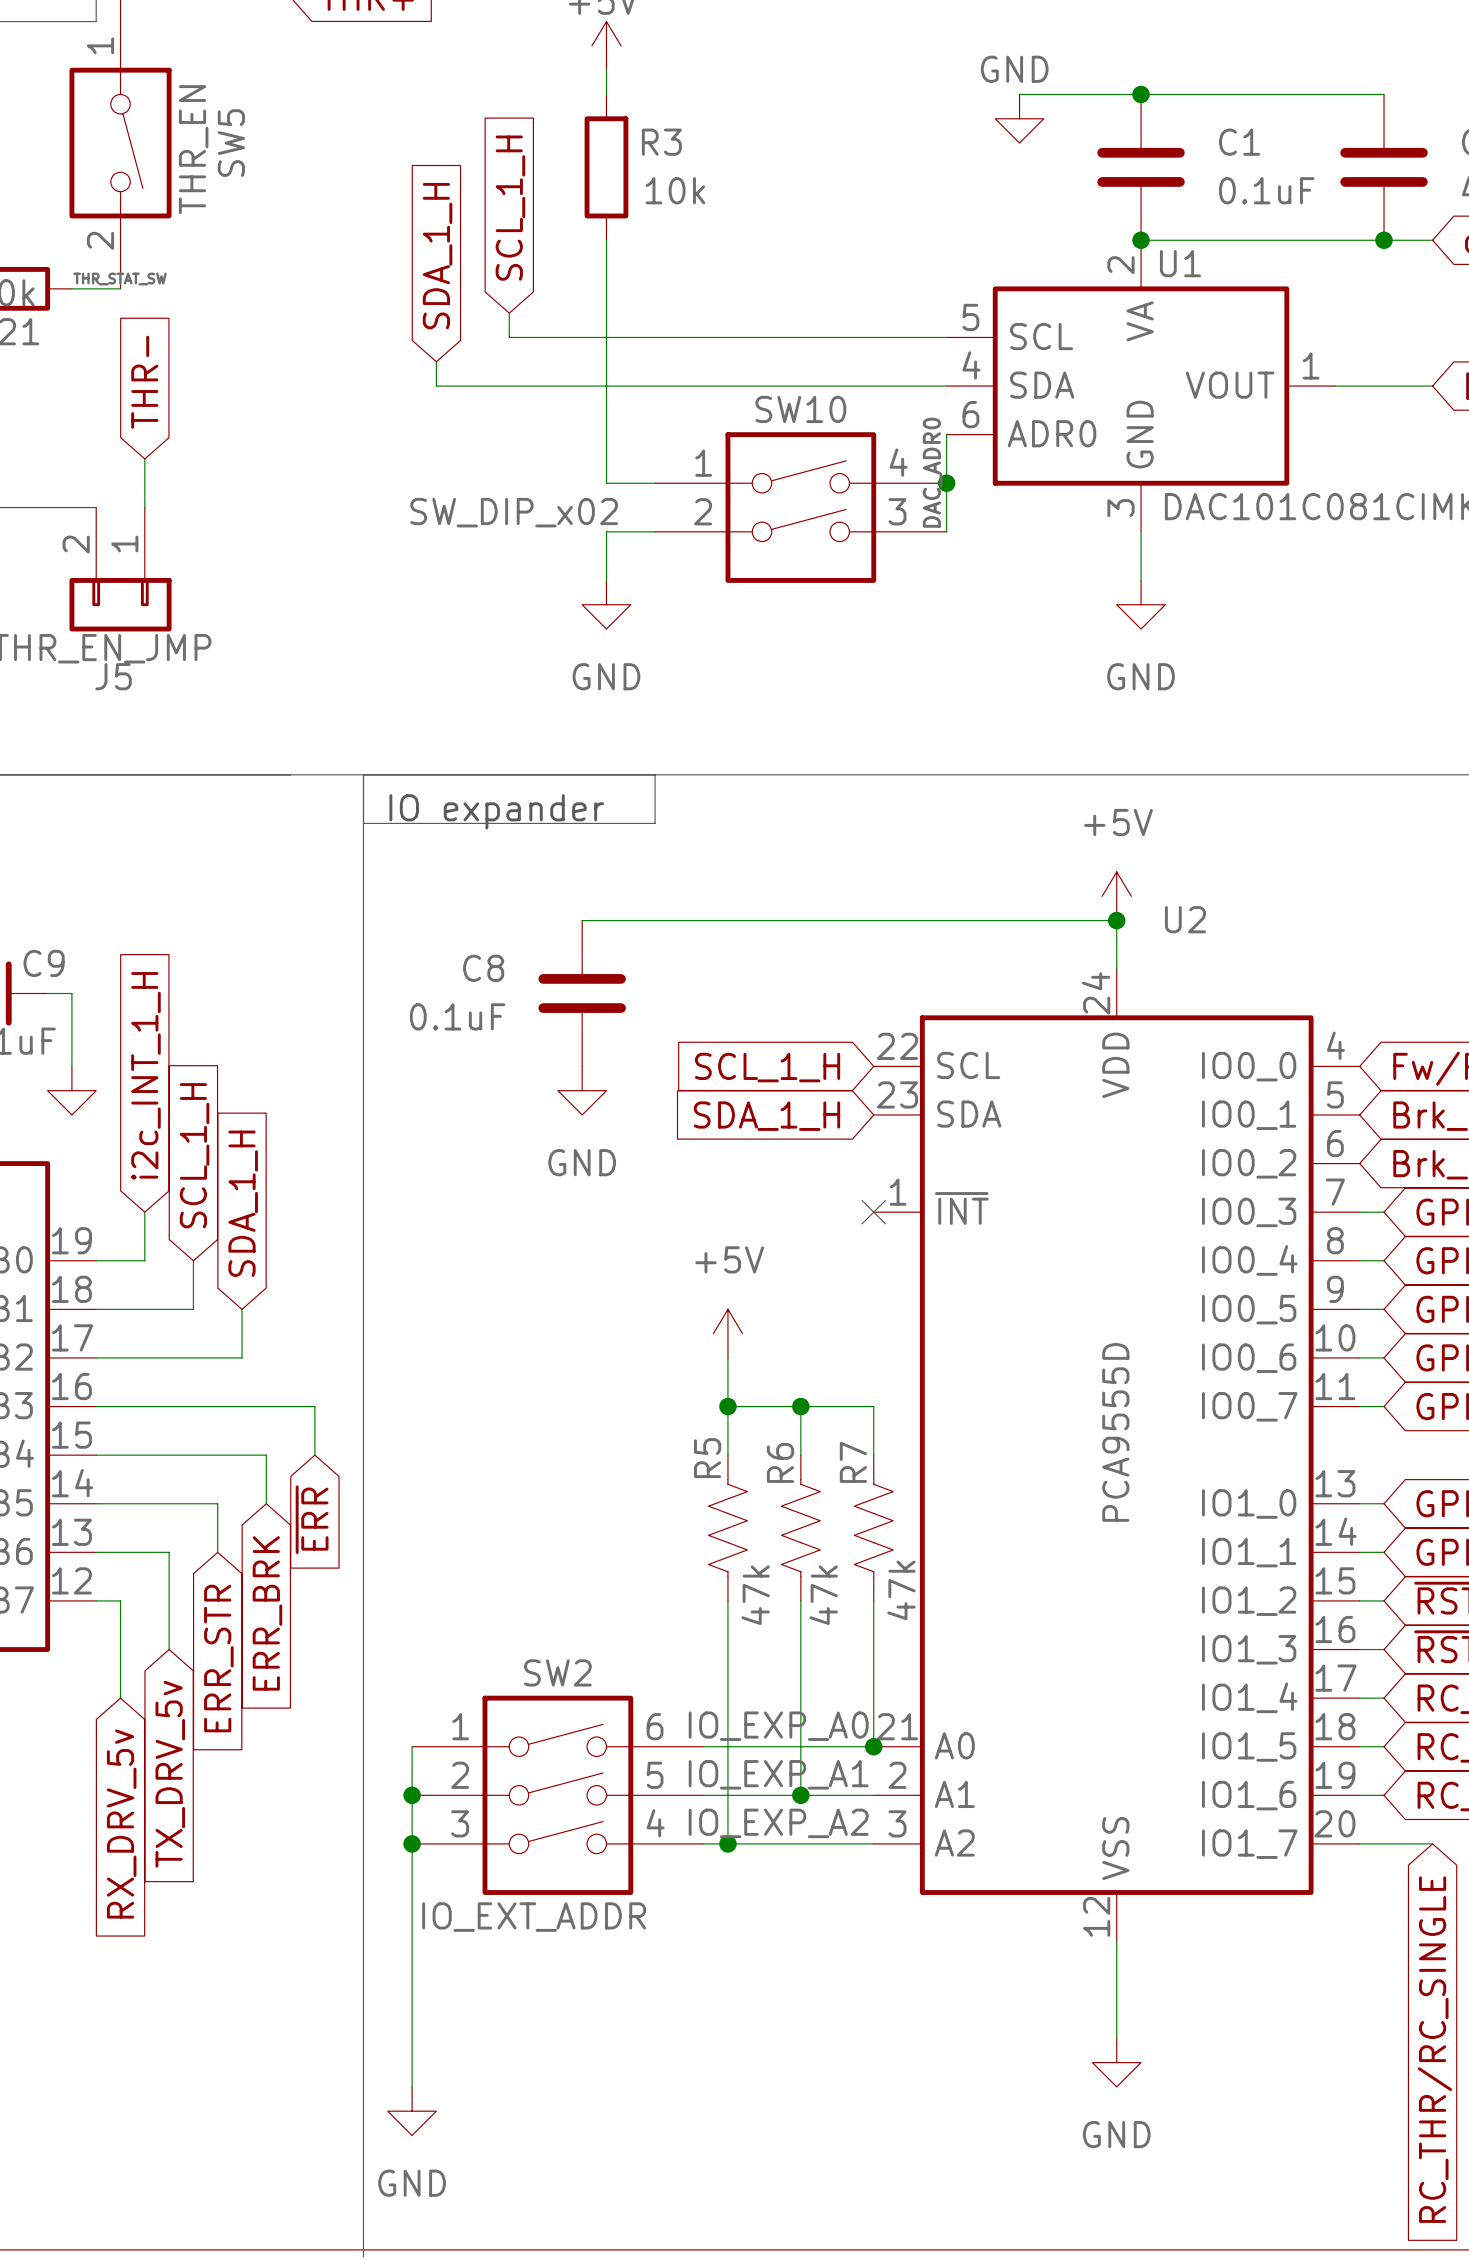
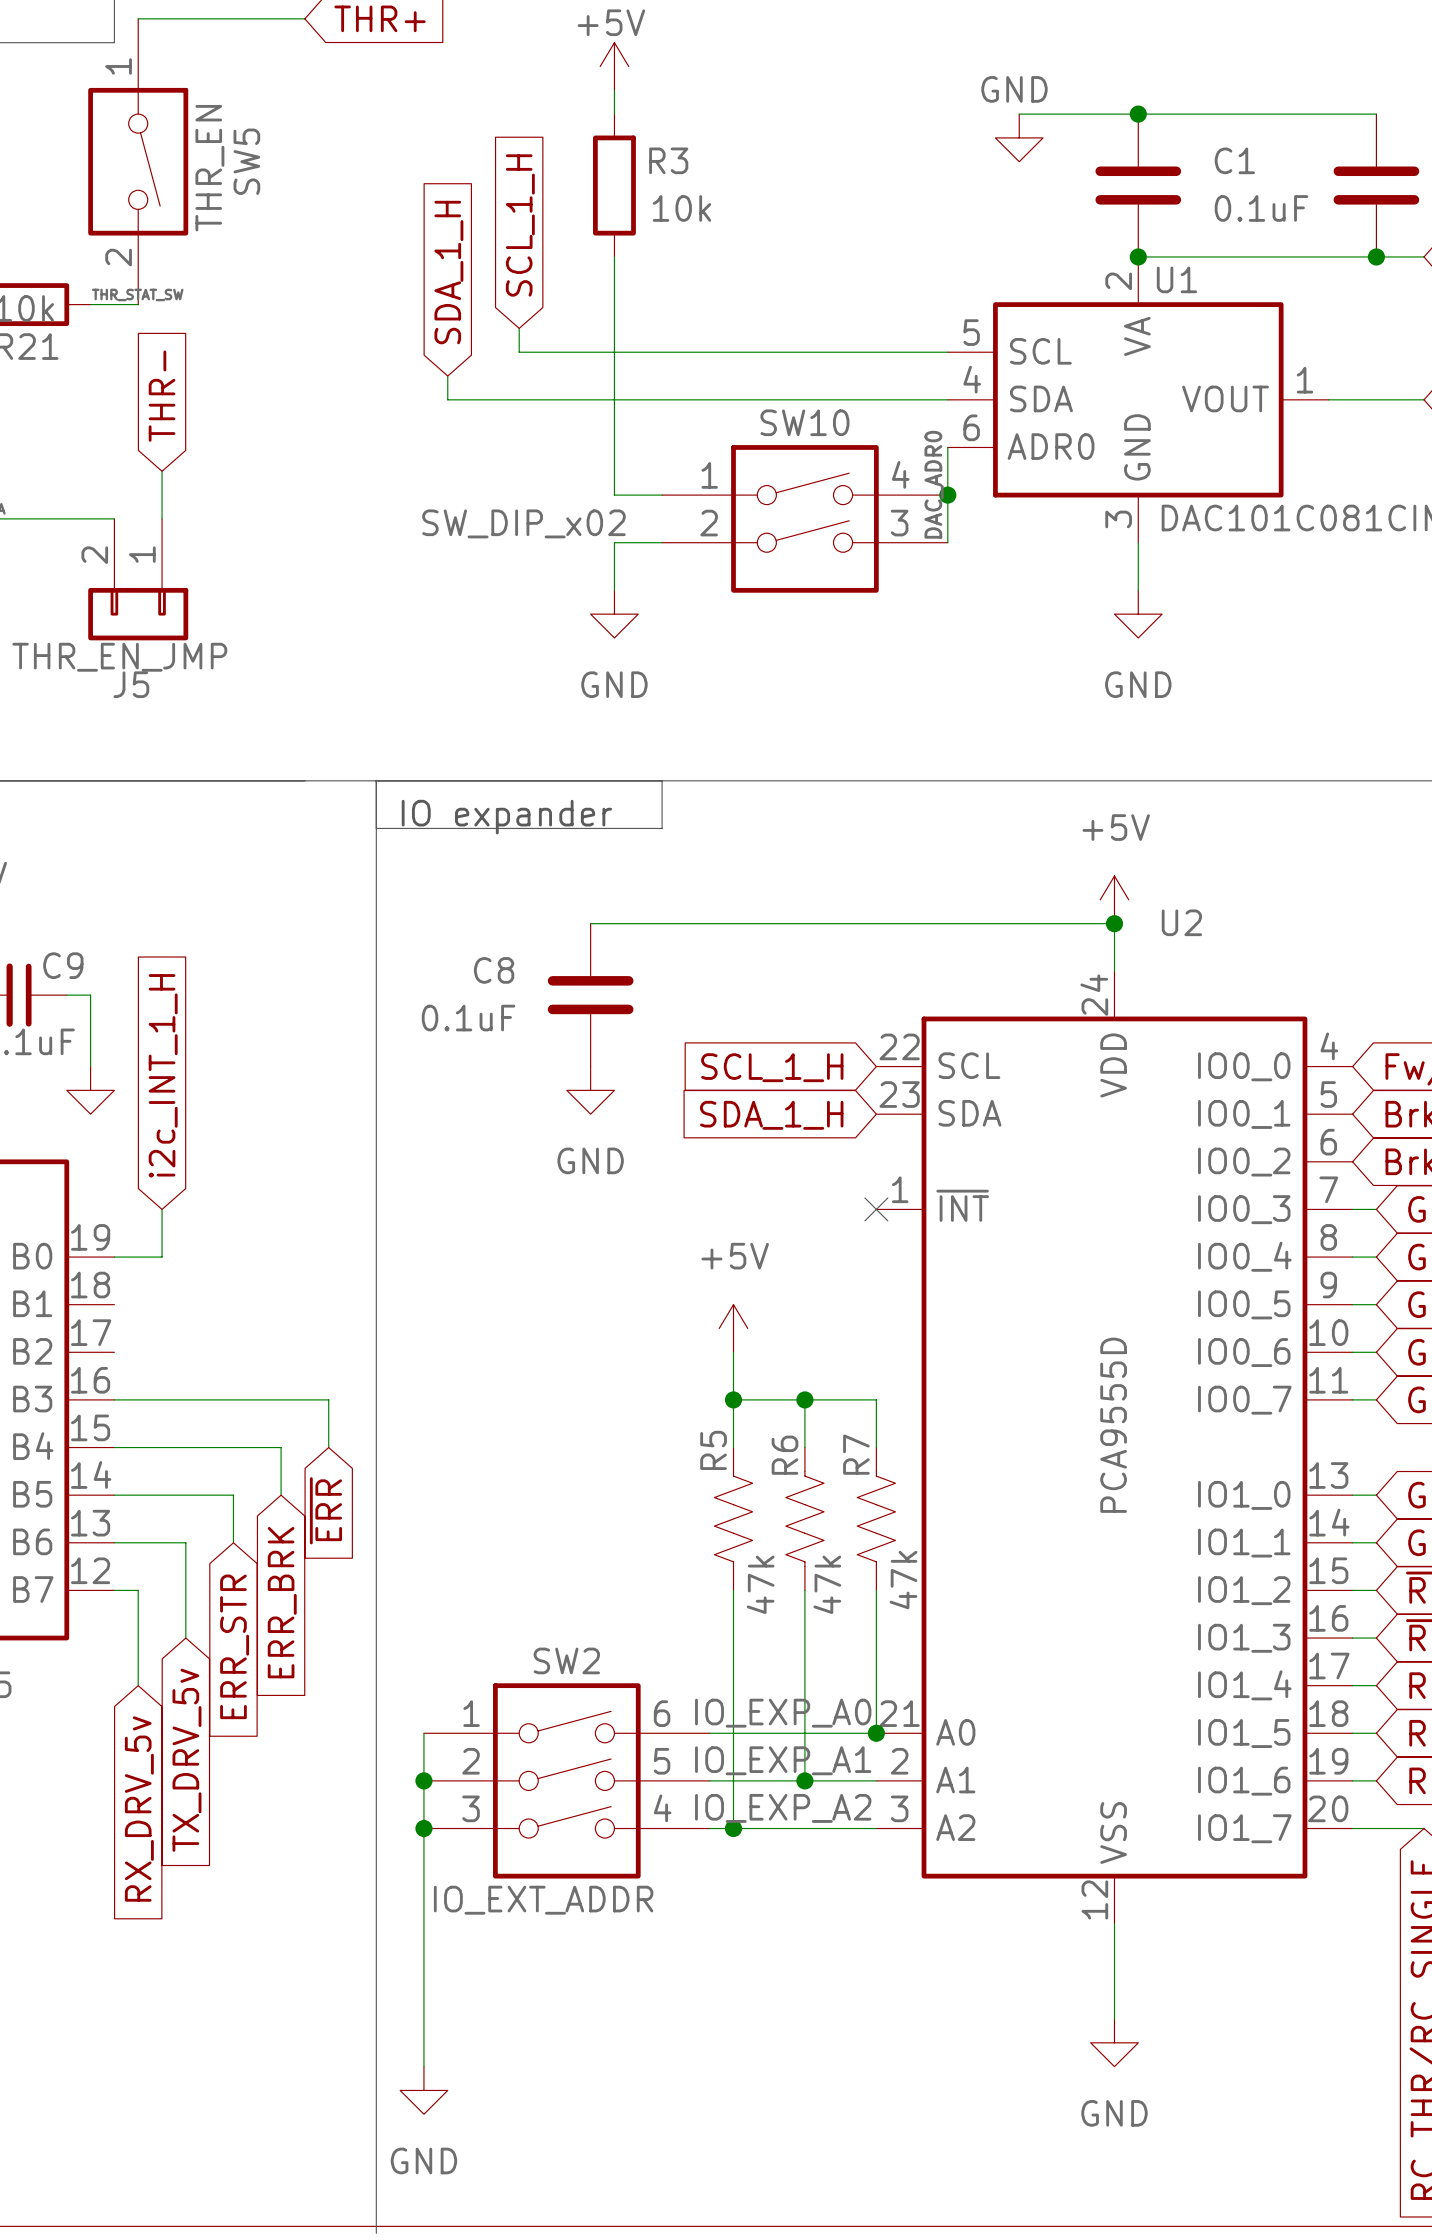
global label: SCL_1_H (194, 1155) -> none
global label: SDA_1_H (243, 1203) -> none
wire: (193, 1260) (193, 1309) (96, 1309) -> none
wire: (242, 1309) (242, 1357) (96, 1357) -> none

